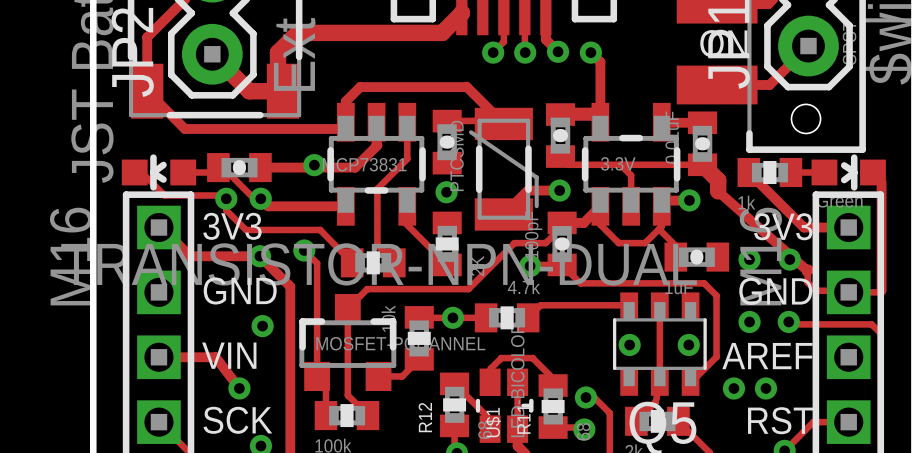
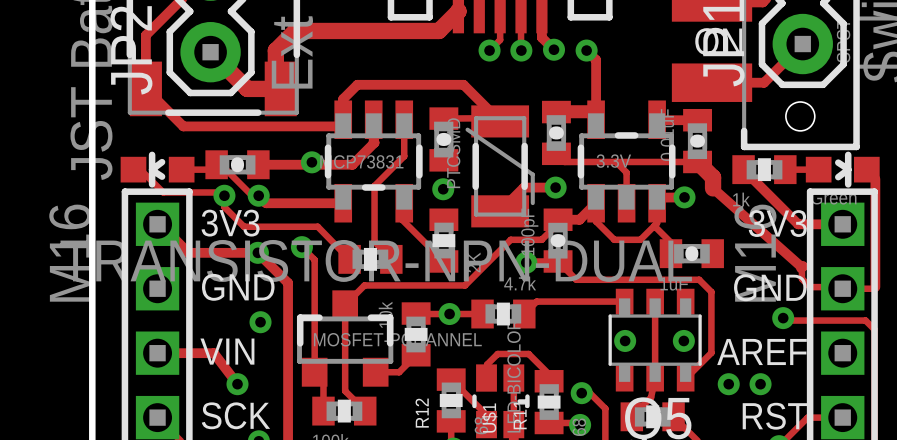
via: (749, 259) -> none
via: (789, 259) -> none
via: (749, 321) -> none

